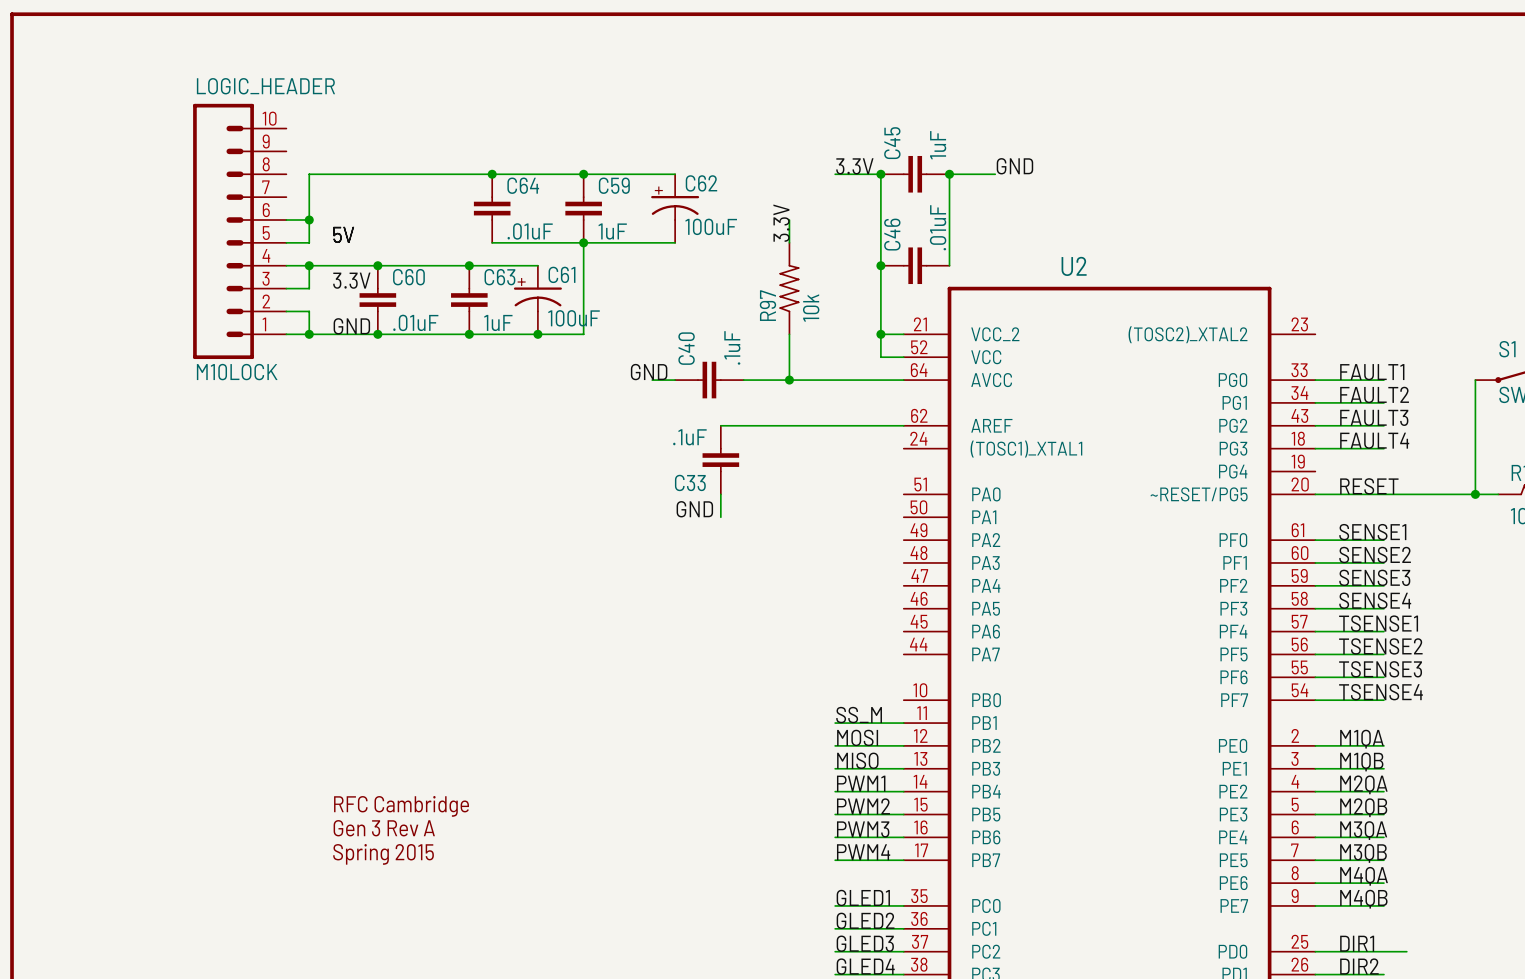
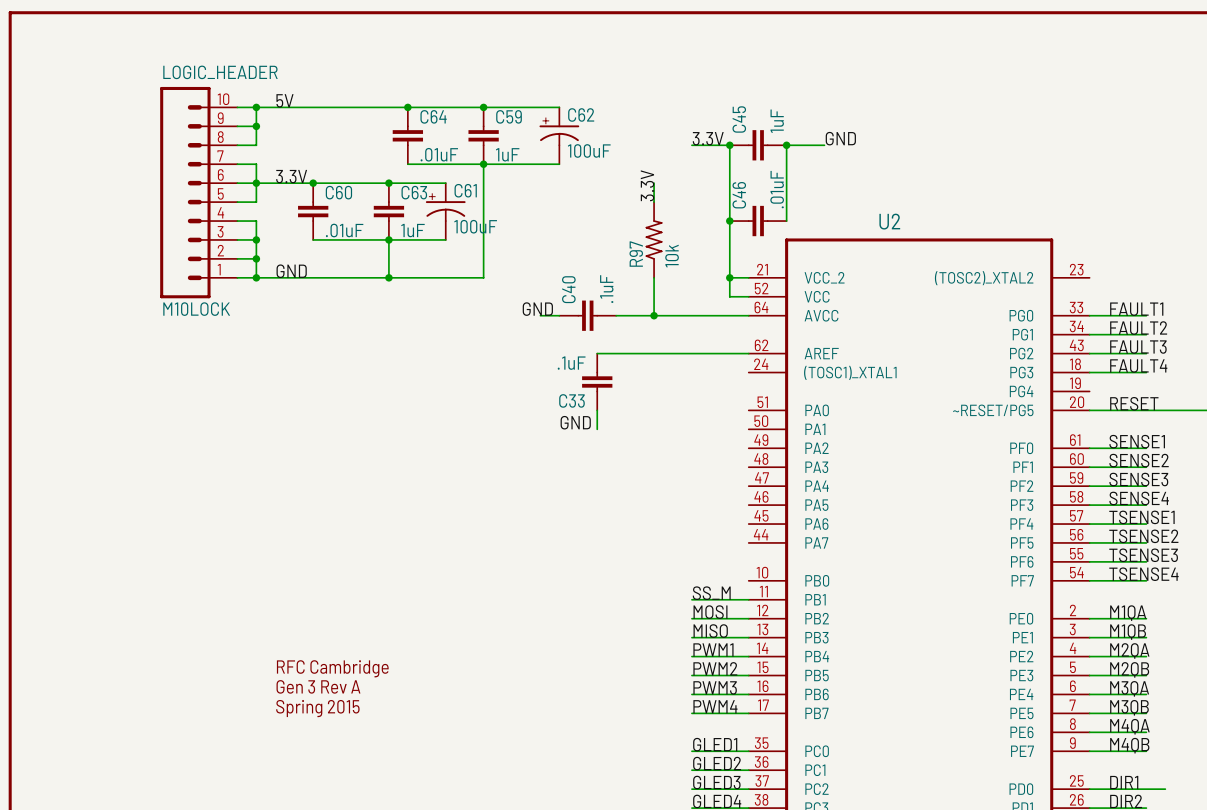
wire: none -> (237, 107) (559, 107)
wire: none -> (256, 107) (256, 145) (237, 145)
junction: none -> (256, 107)
junction: none -> (407, 107)
junction: none -> (483, 107)
wire: none -> (237, 126) (256, 126)
junction: none -> (256, 126)
junction: (492, 174) -> none
junction: (583, 174) -> none
wire: (675, 174) (309, 174) (309, 197) -> (237, 164) (256, 164)
junction: none -> (483, 164)
C64 position: (492, 208) -> (407, 135)
C59 position: (583, 208) -> (483, 135)
C62 position: (675, 208) -> (559, 135)
junction: none -> (313, 183)
junction: none -> (388, 183)
label position: 5V (343, 234) -> 5V (284, 100)
wire: (492, 242) (675, 242) -> (407, 164) (559, 164)
junction: (583, 242) -> none
wire: (309, 265) (537, 265) -> (256, 183) (445, 183)
junction: (309, 265) -> none
junction: (377, 265) -> none
junction: (469, 265) -> none
label position: 3.3V (351, 280) -> 3.3V (291, 176)
wire: none -> (256, 239) (256, 258)
junction: none -> (256, 239)
wire: none -> (313, 239) (445, 239)
junction: none -> (388, 239)
C60 position: (377, 300) -> (313, 211)
C63 position: (469, 300) -> (388, 211)
C61 position: (537, 300) -> (445, 211)
junction: none -> (256, 258)
junction: (377, 334) -> none
junction: (537, 334) -> none

